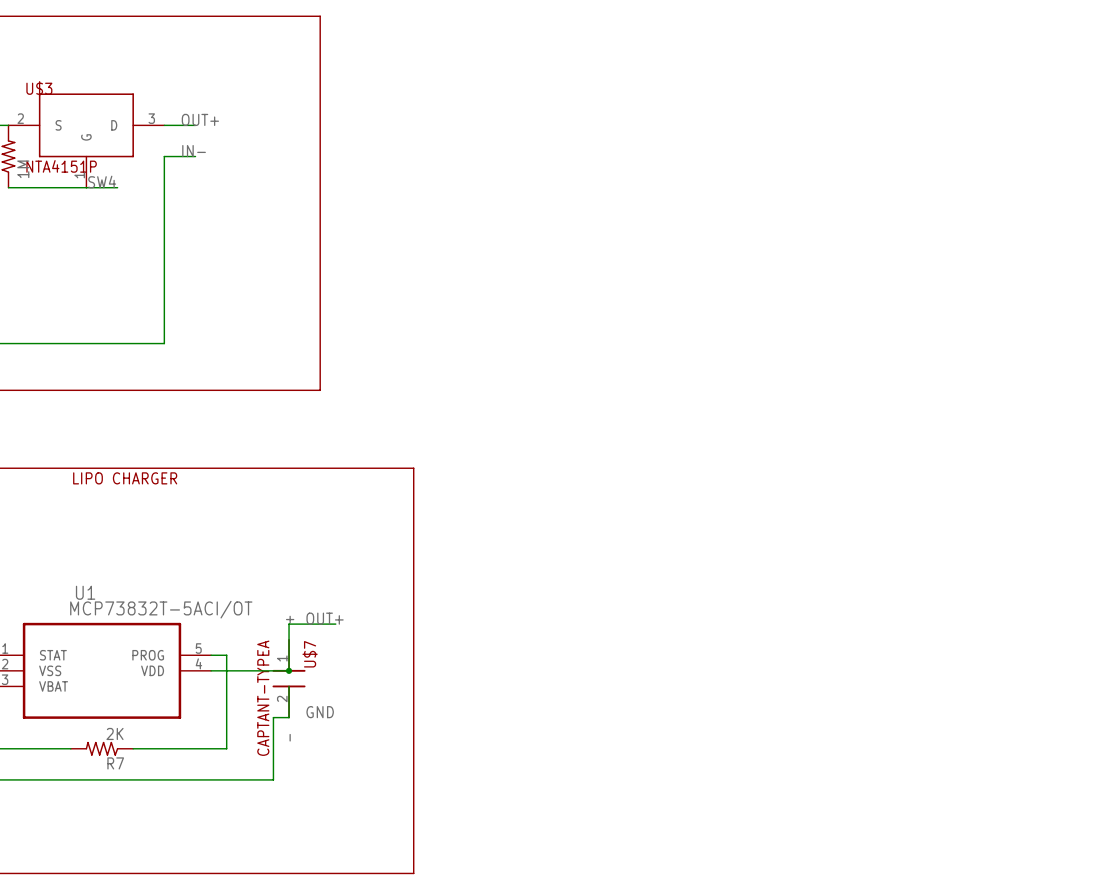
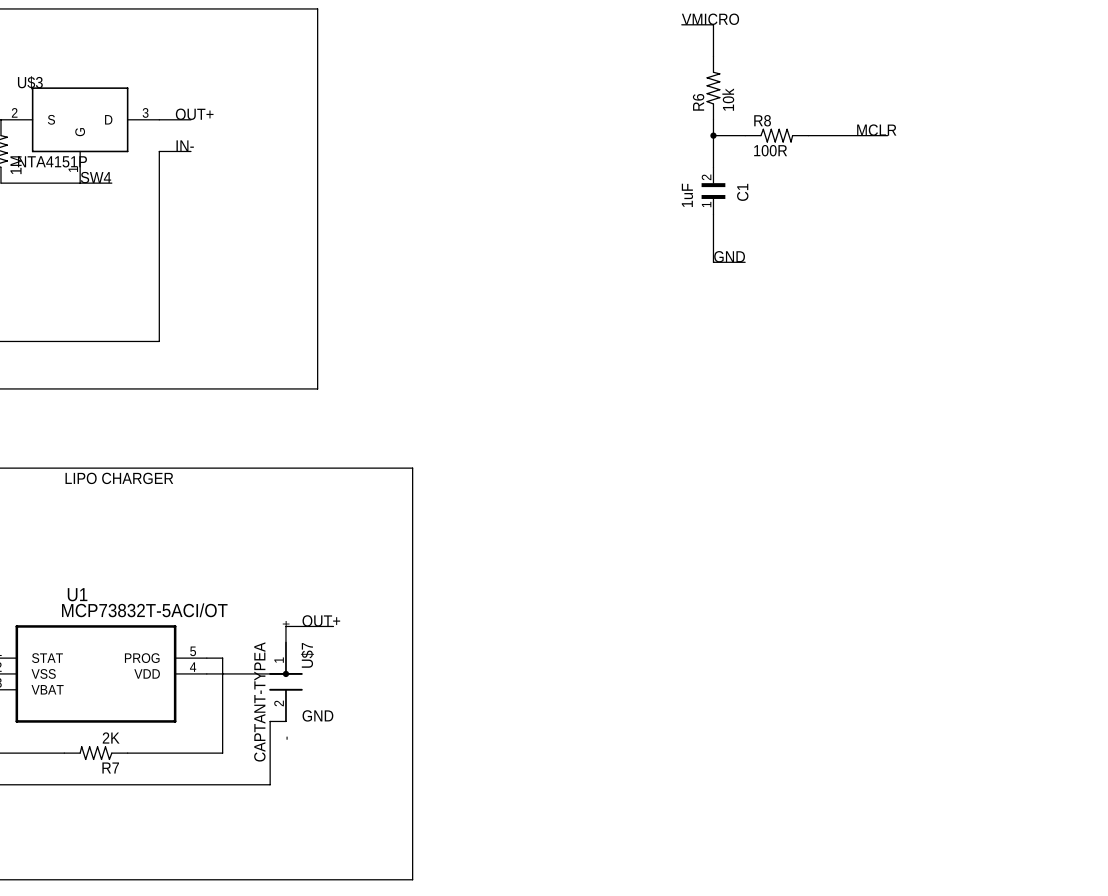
label: none -> VMICRO (710, 19)
wire: none -> (681, 24) (713, 24) (713, 56)
R6: none -> 10k (713, 88)
wire: none -> (713, 119) (713, 167)
label: none -> MCLR (876, 130)
wire: none -> (713, 135) (745, 135)
junction: none -> (713, 135)
R8: none -> 100R (776, 135)
wire: none -> (808, 135) (887, 135)
C1: none -> 1uF (713, 191)
wire: none -> (713, 214) (713, 262) (745, 262)
label: none -> GND (729, 256)

